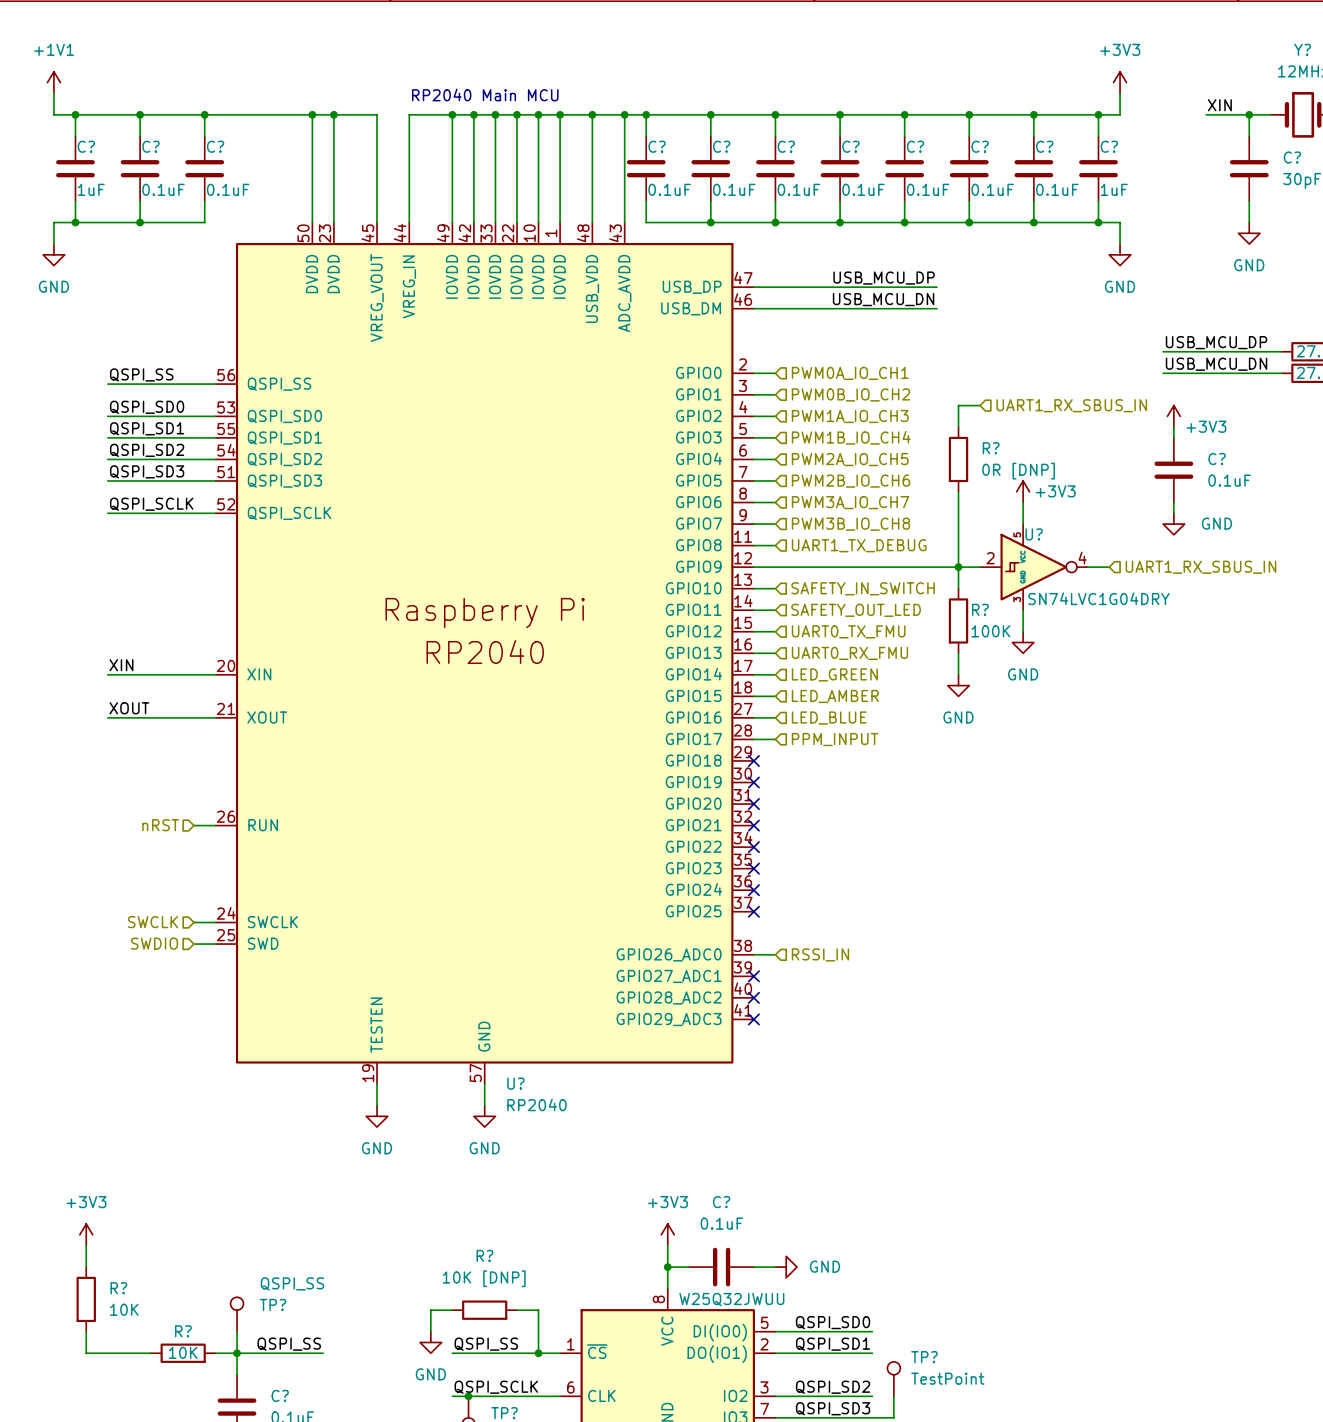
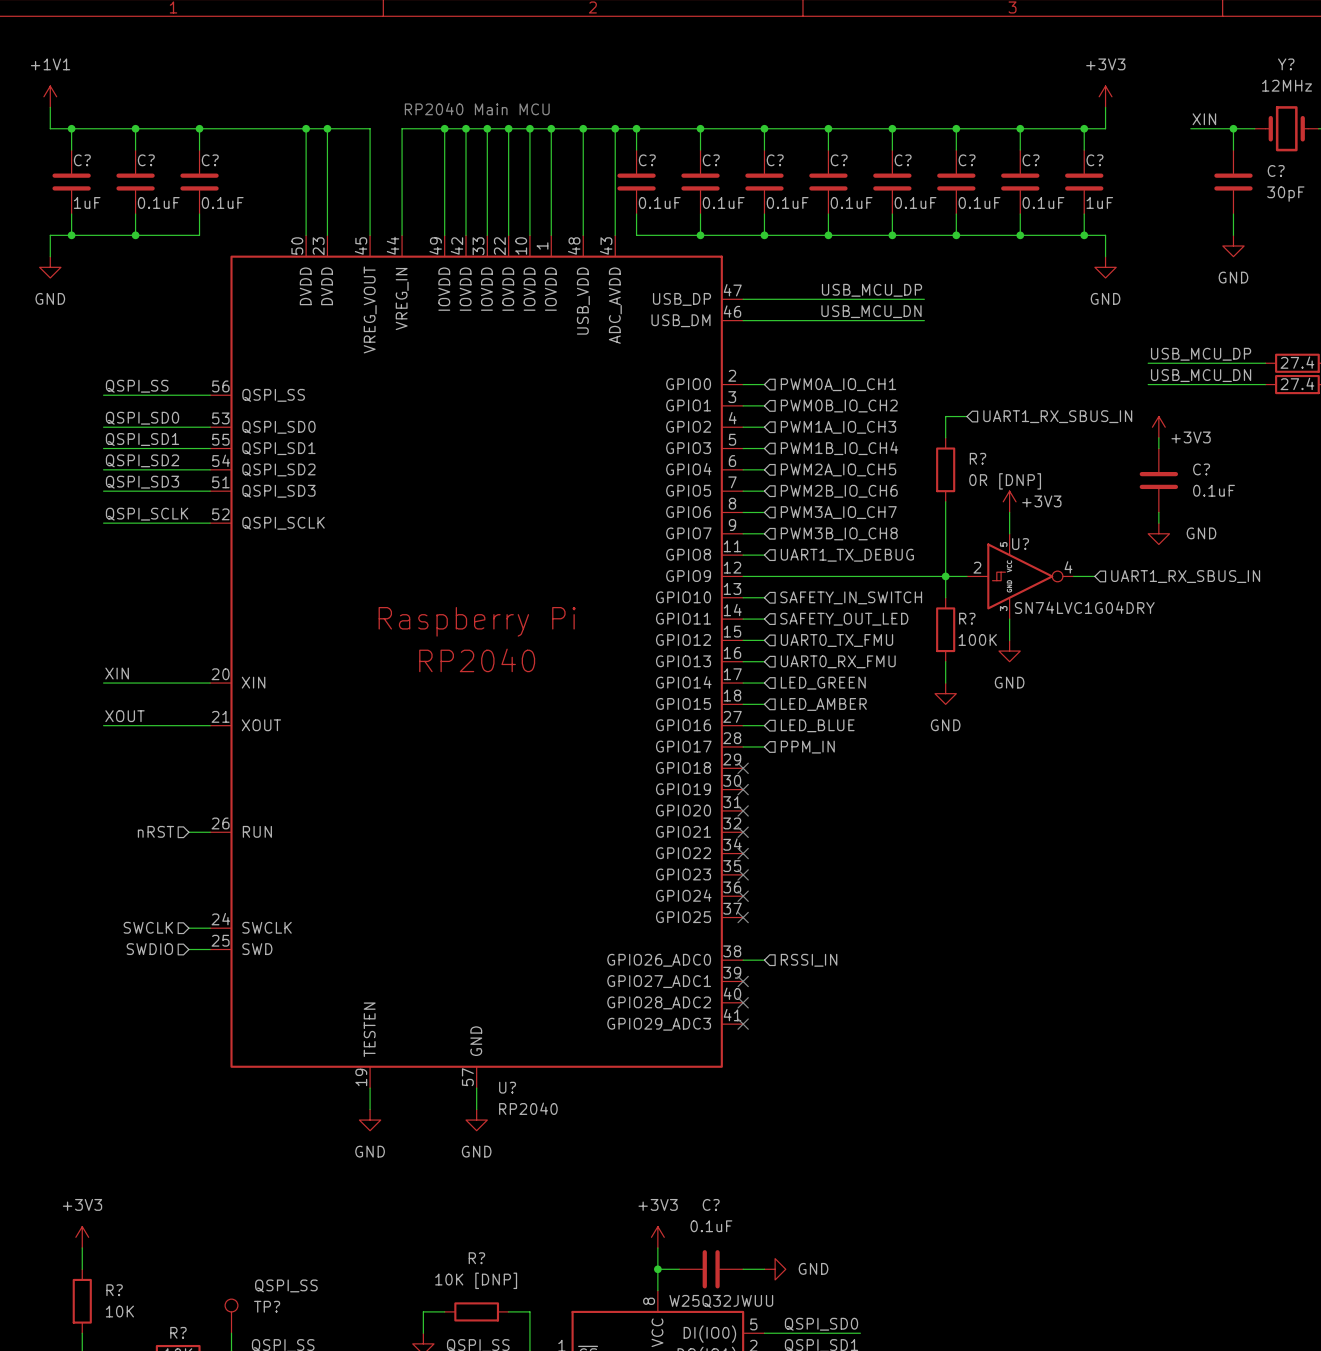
hierarchical label: PPM_INPUT (835, 739) -> PPM_IN (807, 747)

